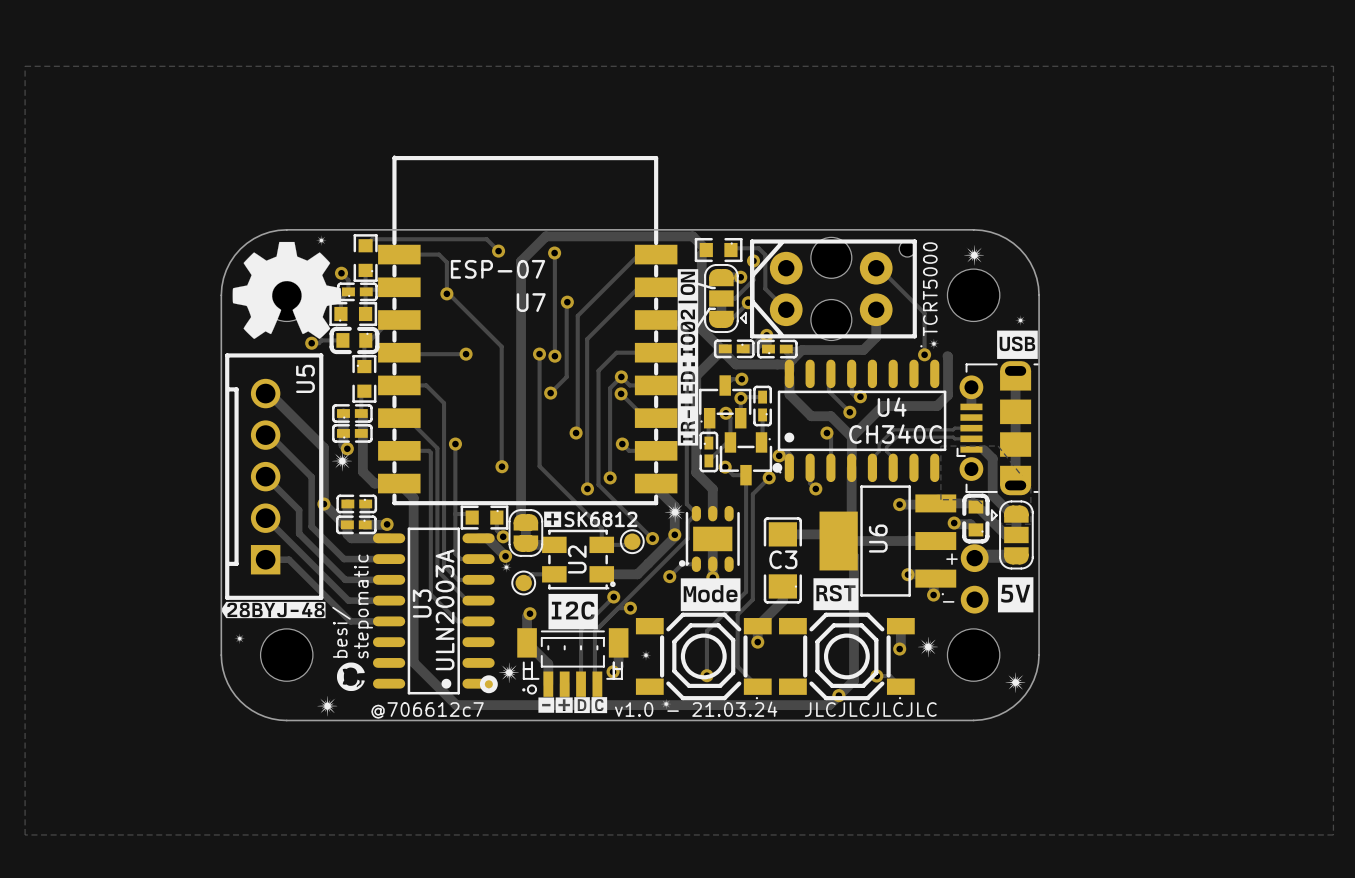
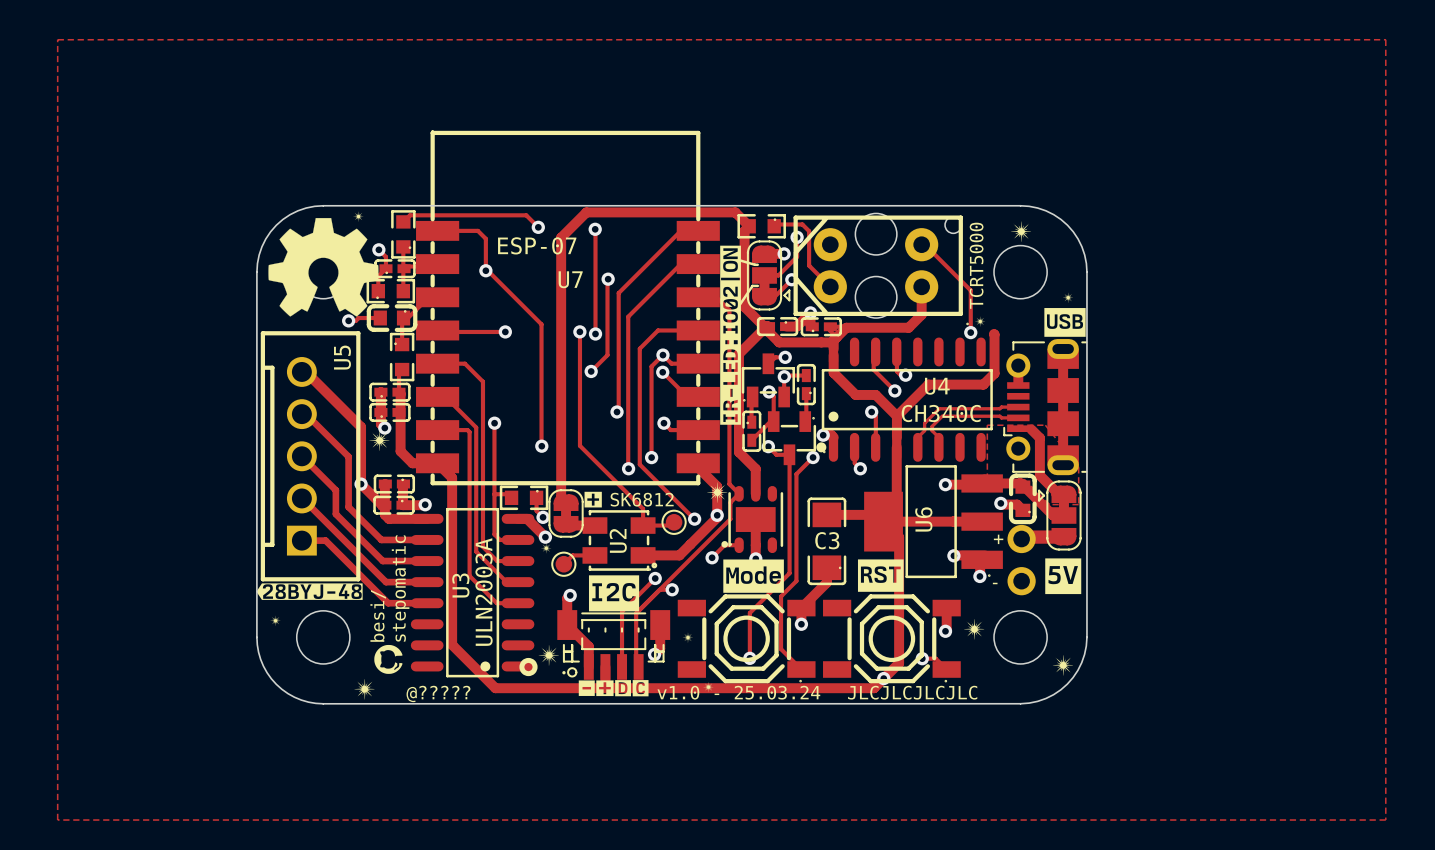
text: v1.0 - 21.03.24 (696, 709) -> v1.0 - 25.03.24 (738, 692)
text: @706612c7 (427, 710) -> @????? (438, 693)

